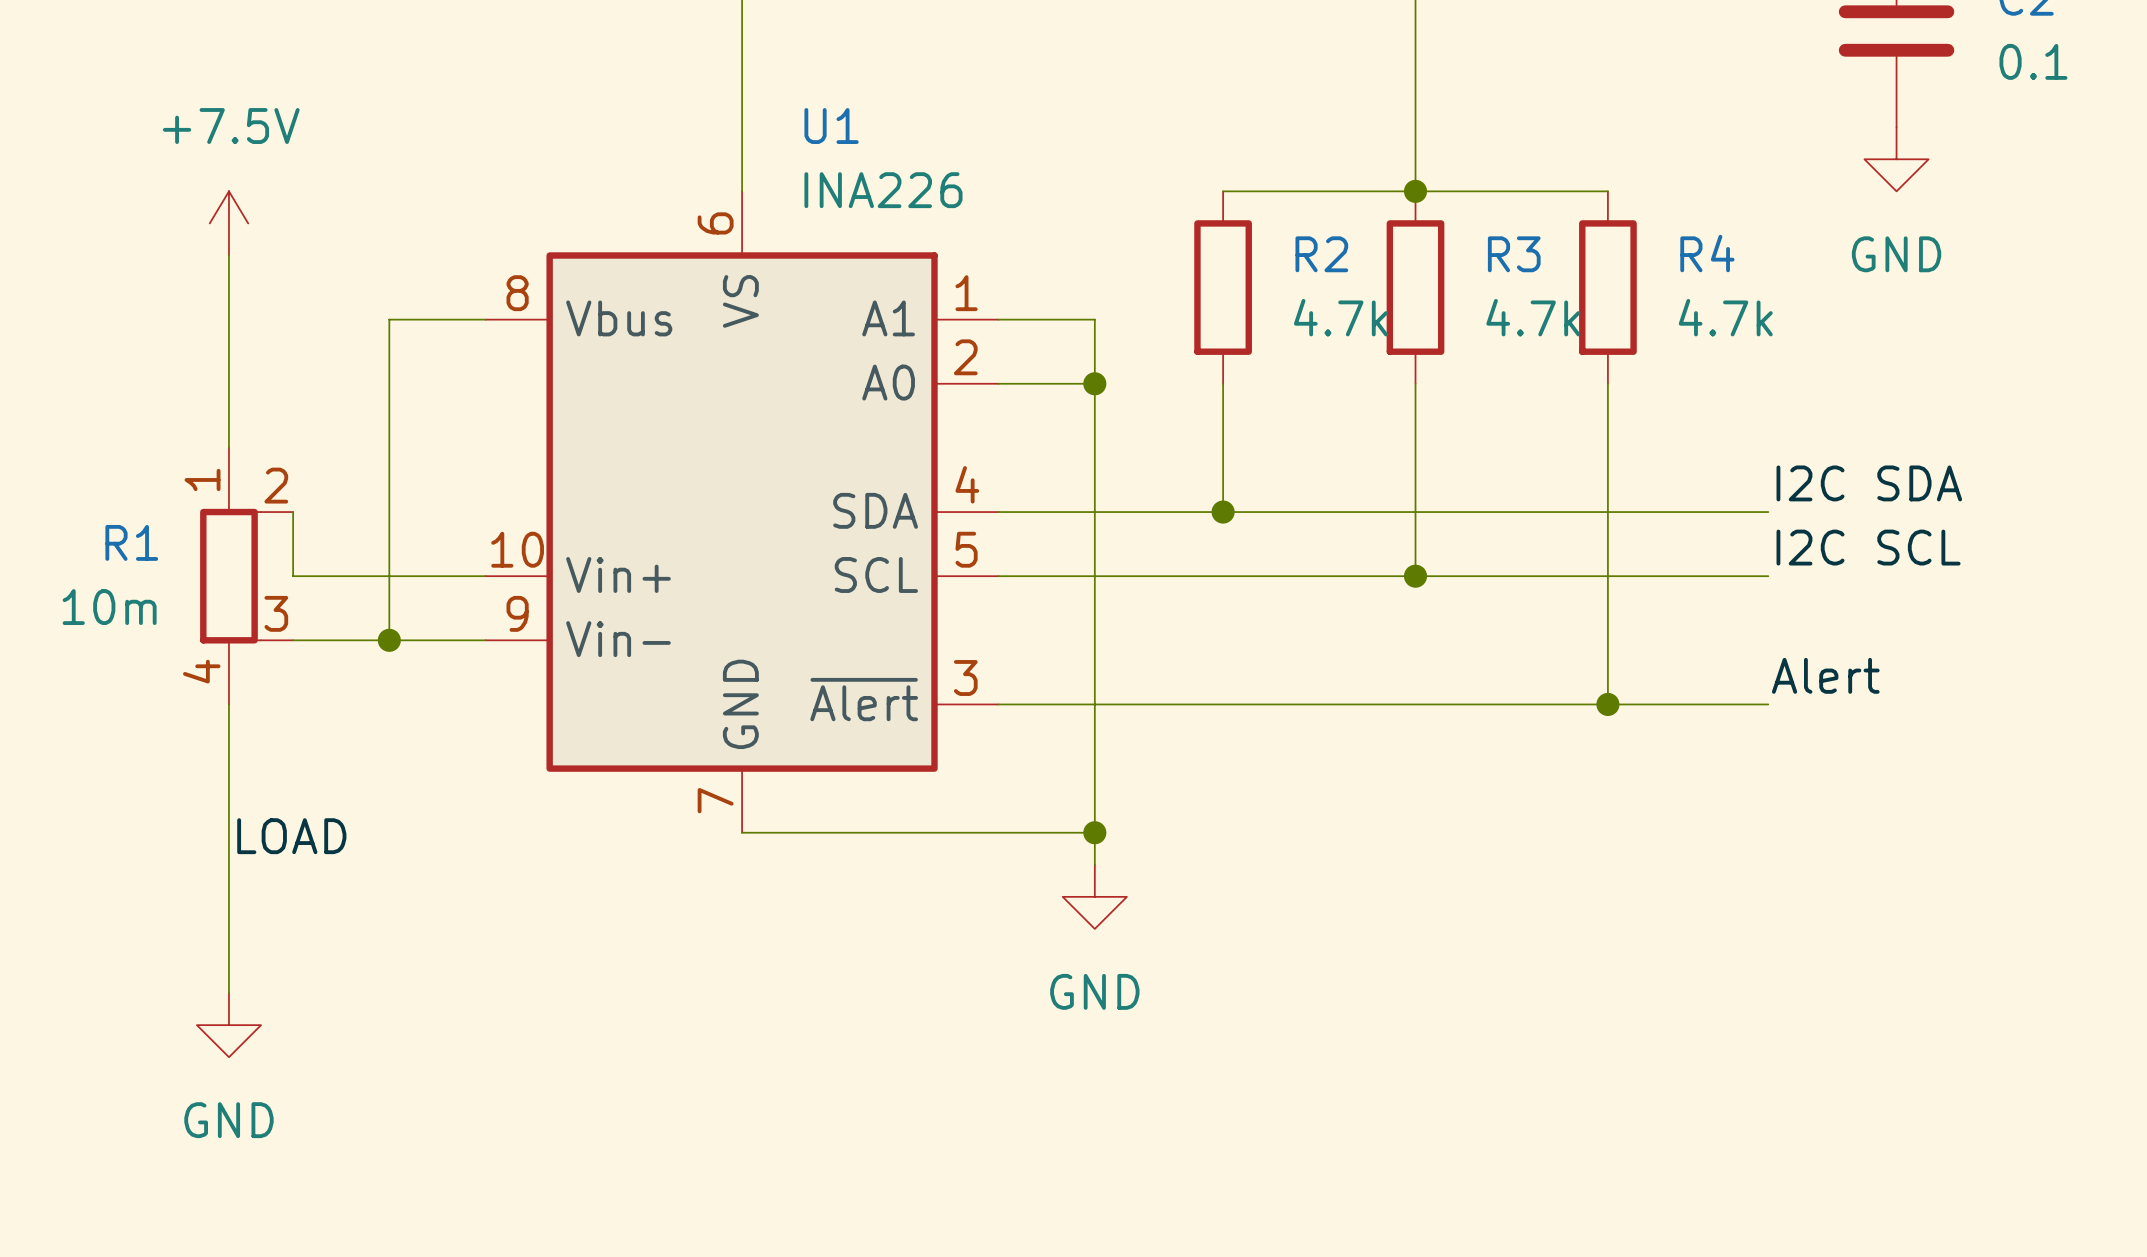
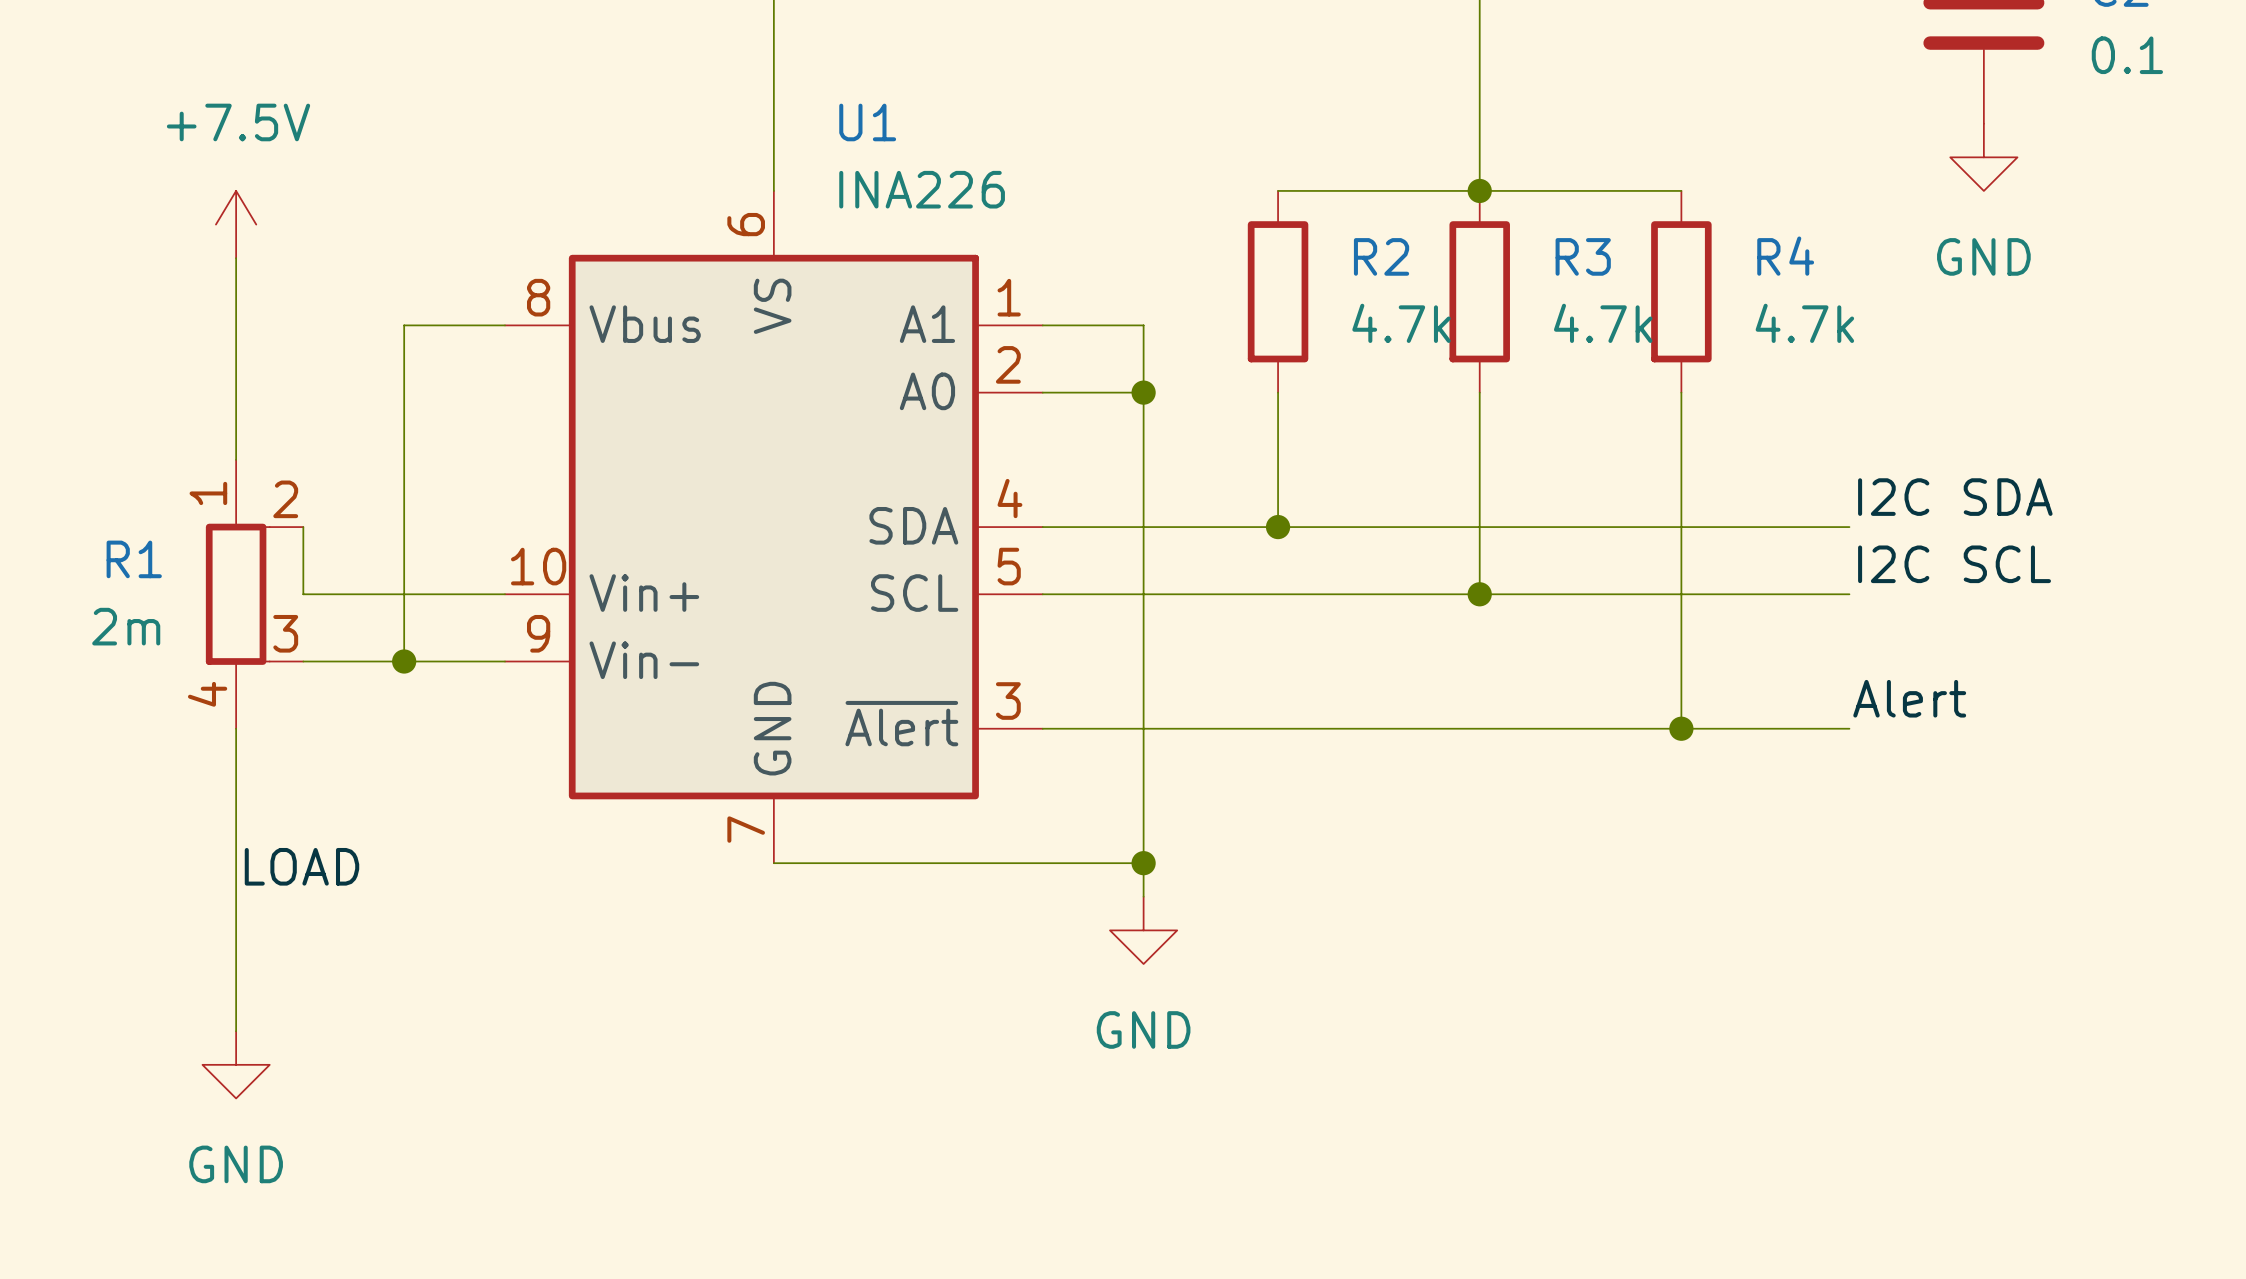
R1 value: 10m (109, 607) -> 2m (126, 626)

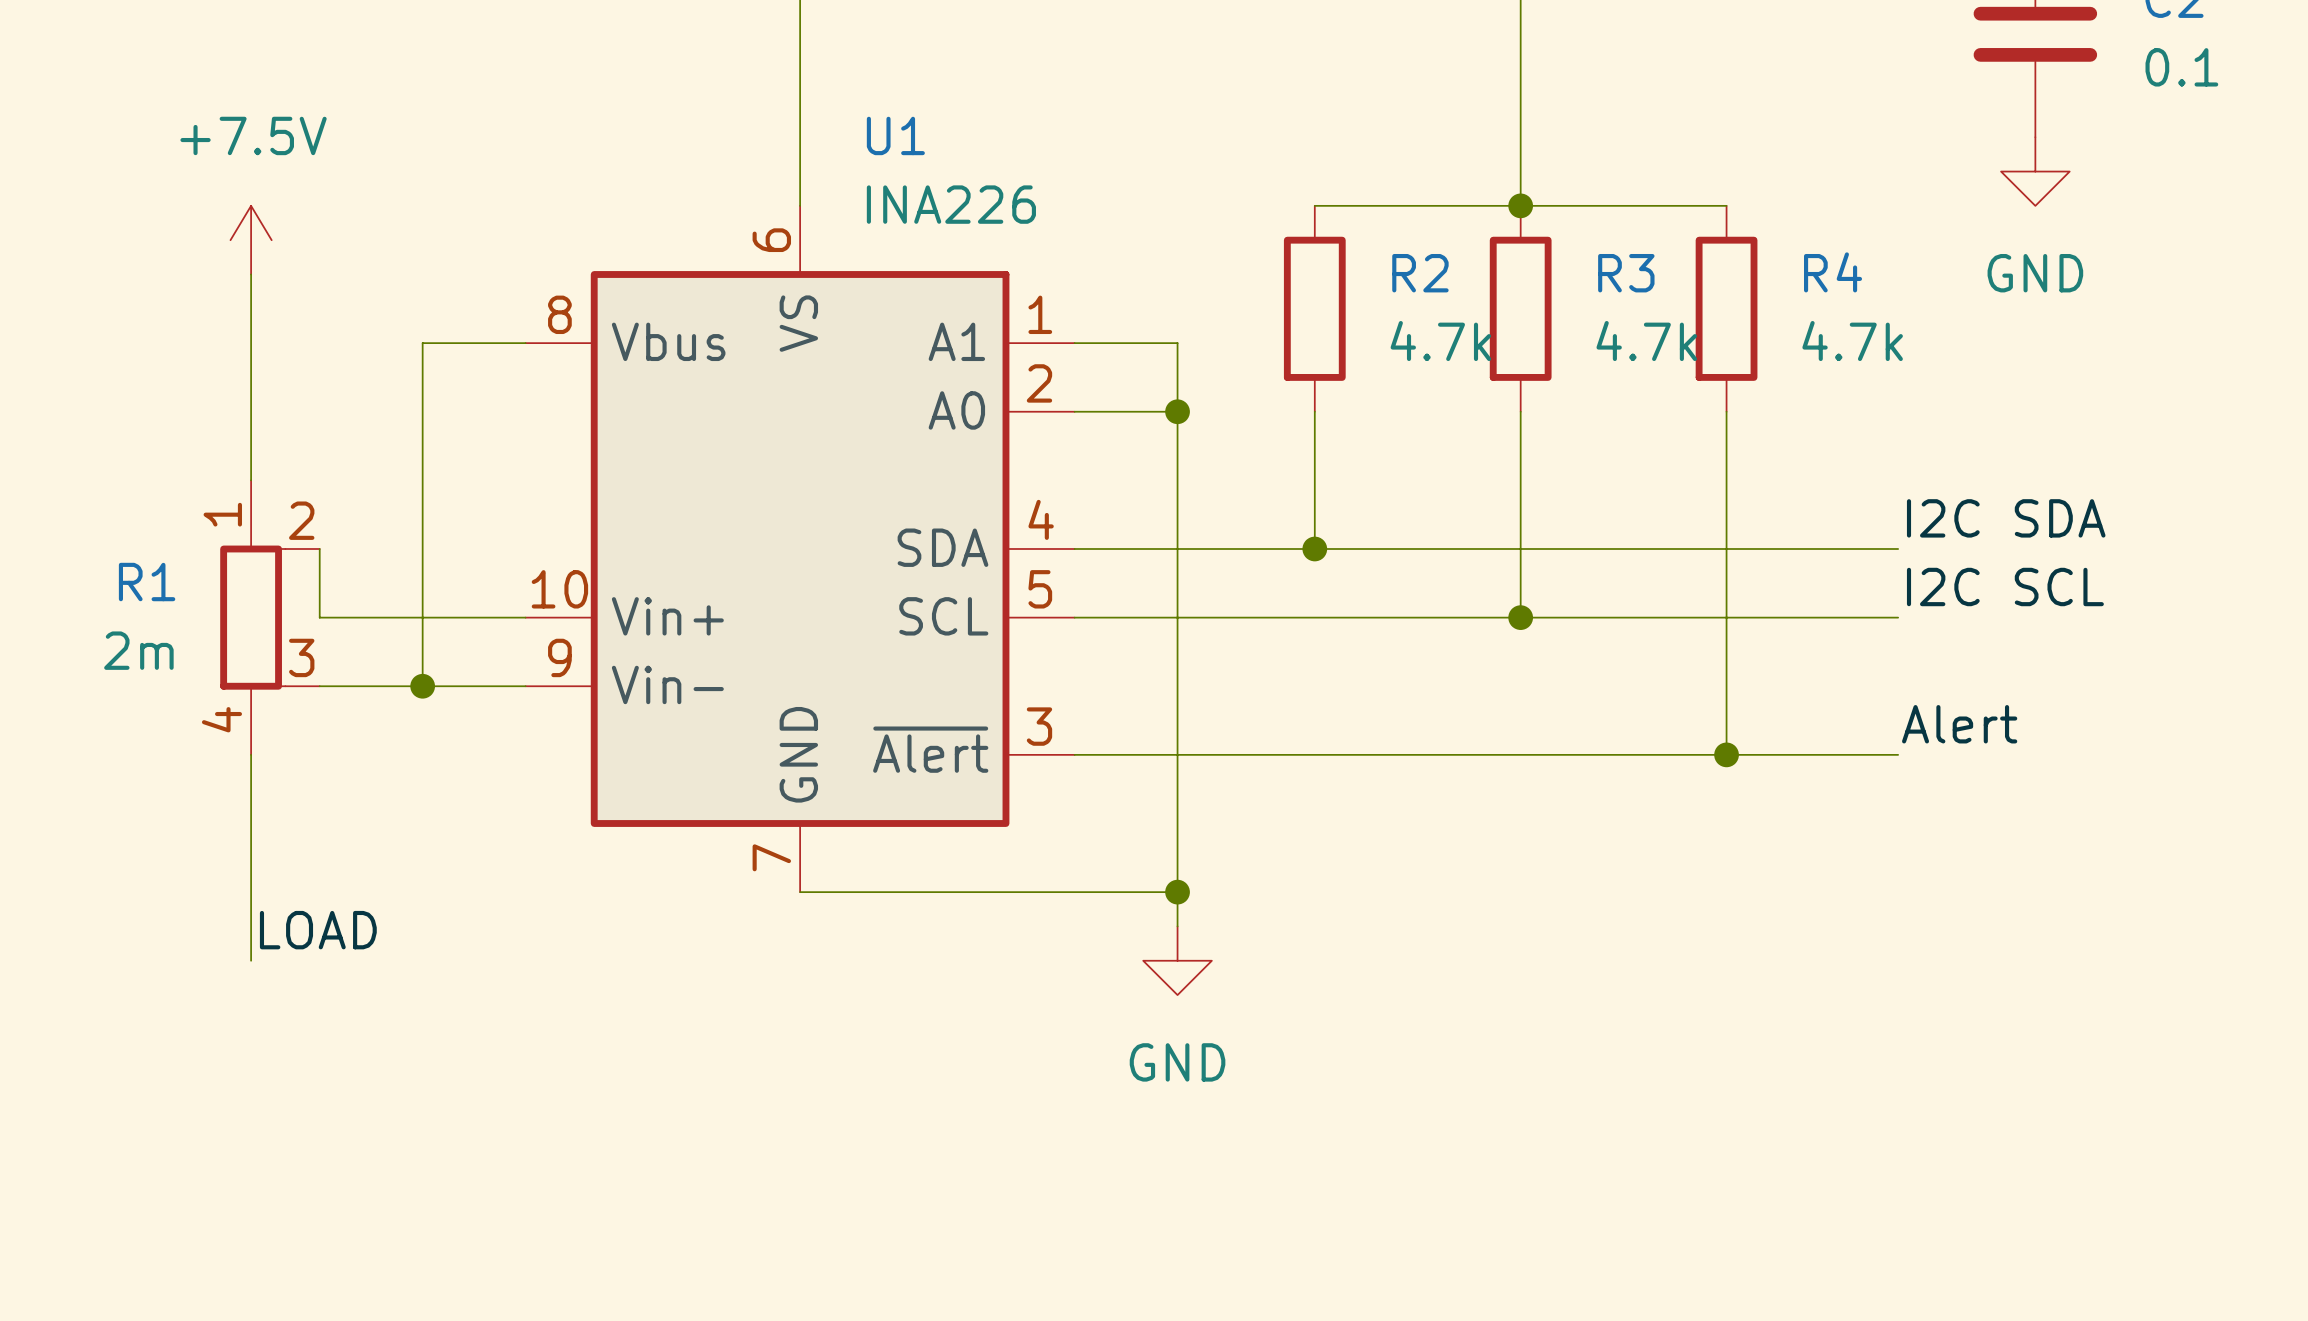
label position: LOAD (301, 866) -> LOAD (318, 930)
wire: (236, 930) (236, 1031) -> none
power symbol: GND (236, 1064) -> none

